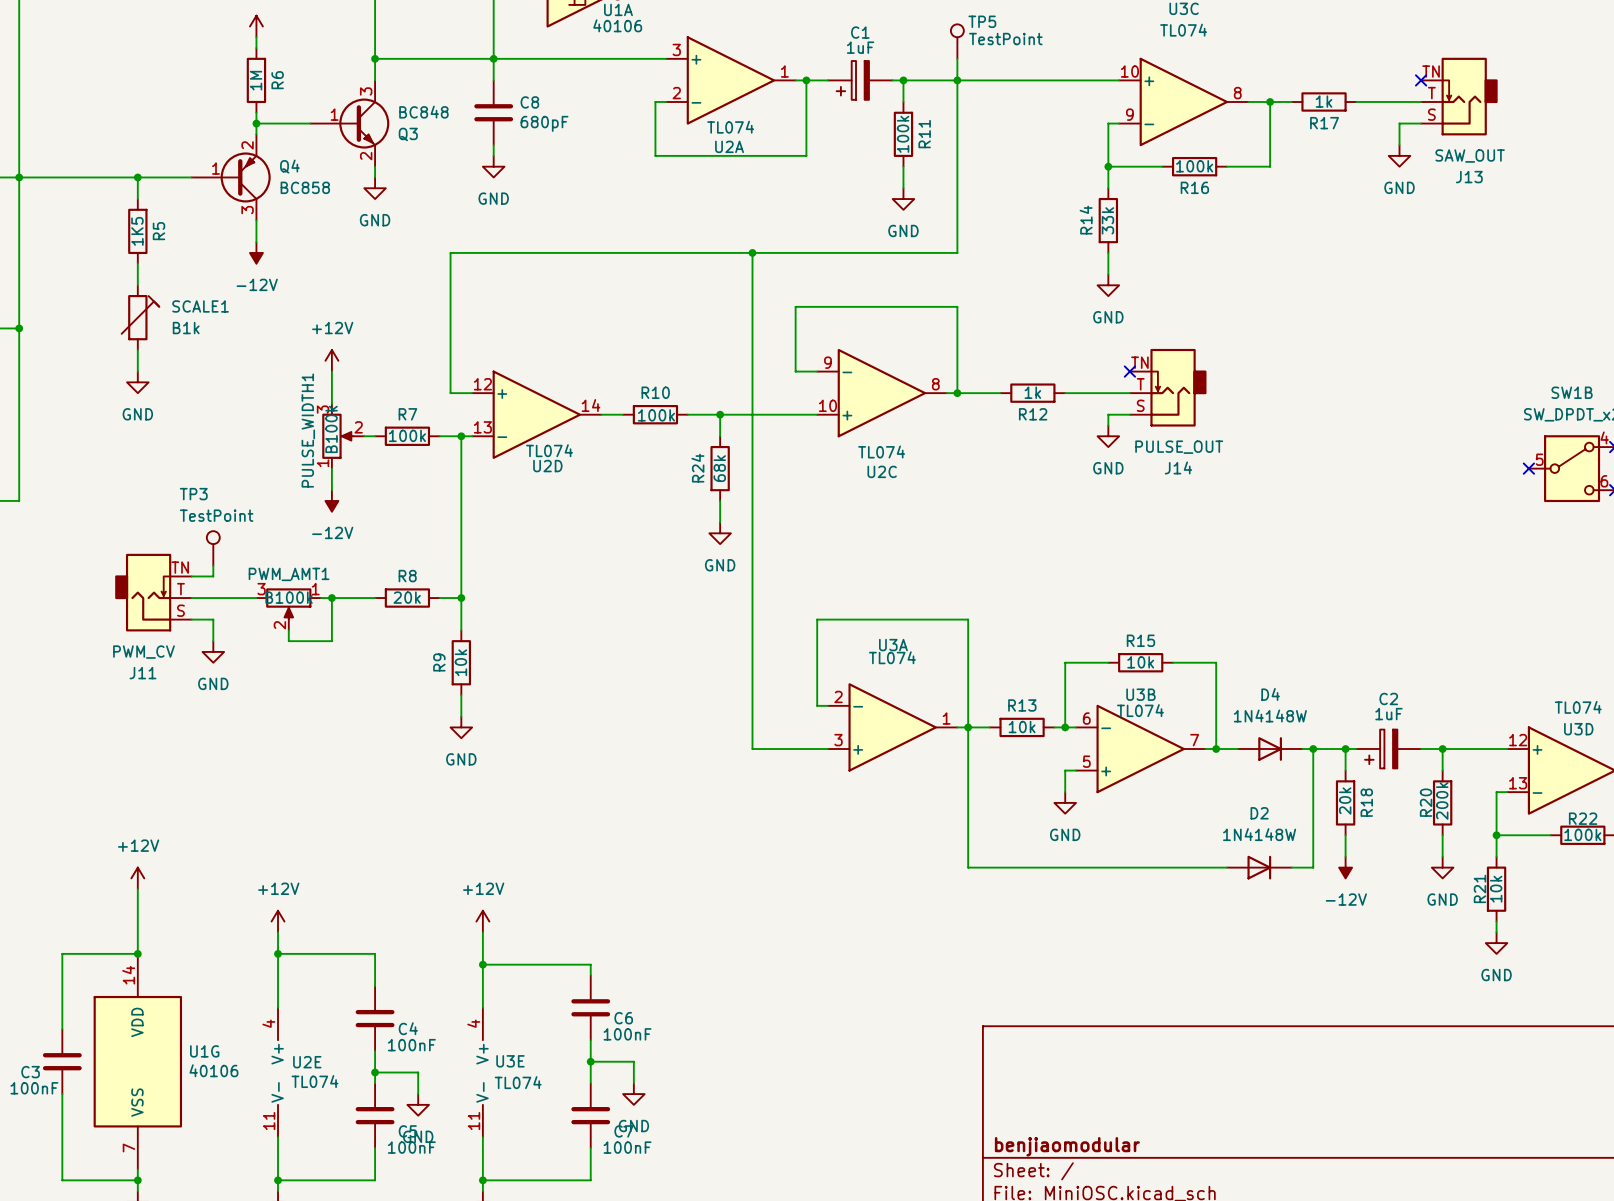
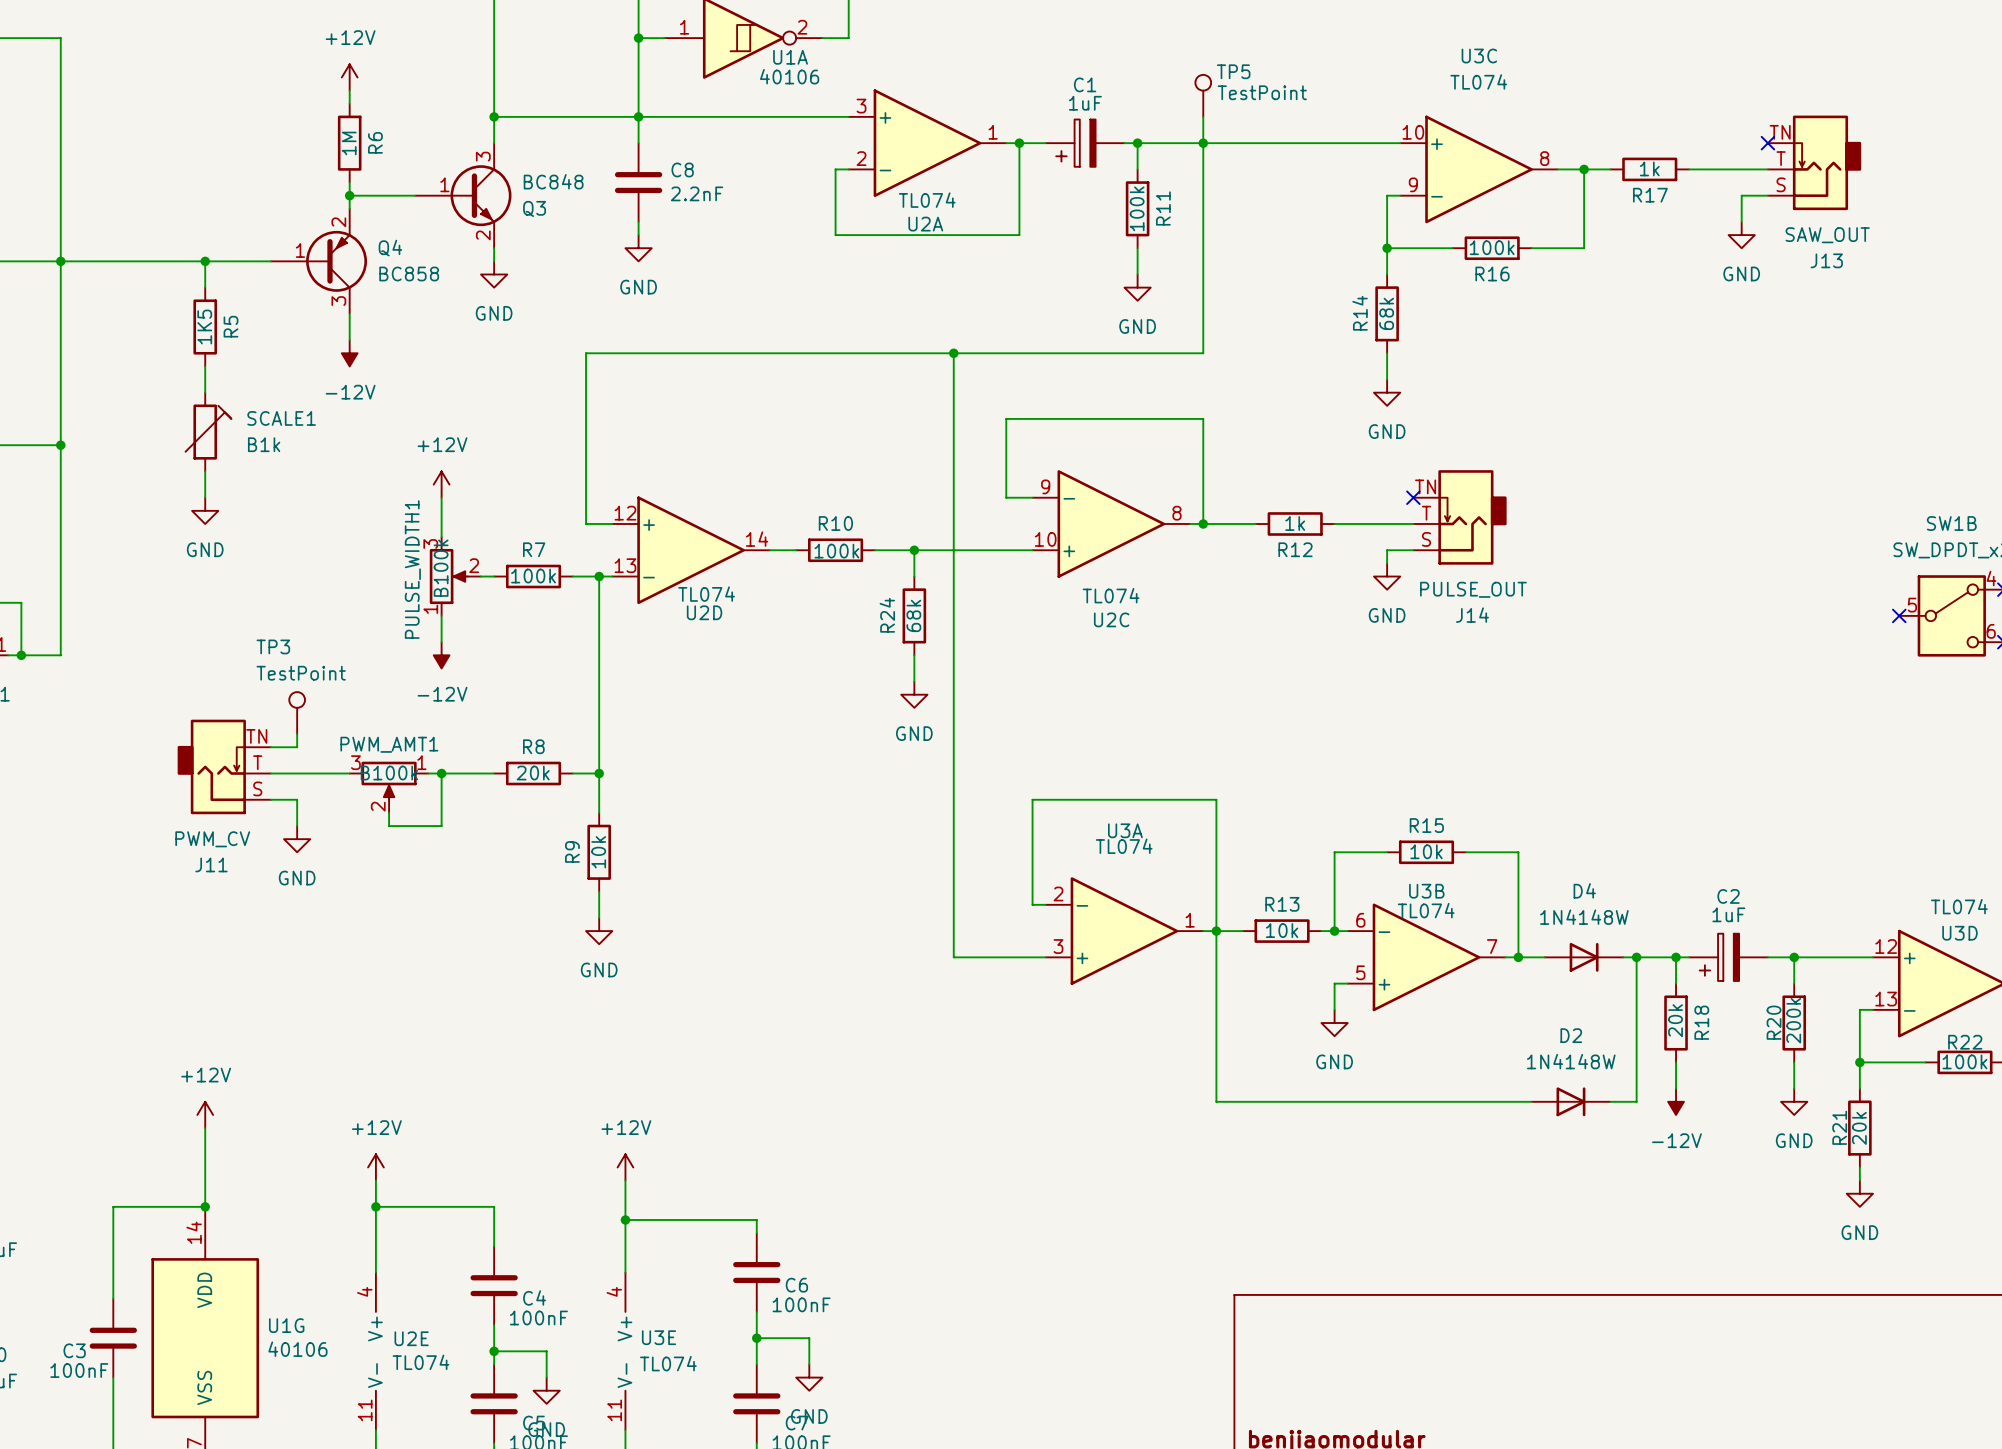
C8 value: 680pF (544, 123) -> 2.2nF (697, 193)
R14 value: 33k (1107, 220) -> 68k (1386, 313)
R21 value: 10k (1496, 889) -> 20k (1859, 1128)

